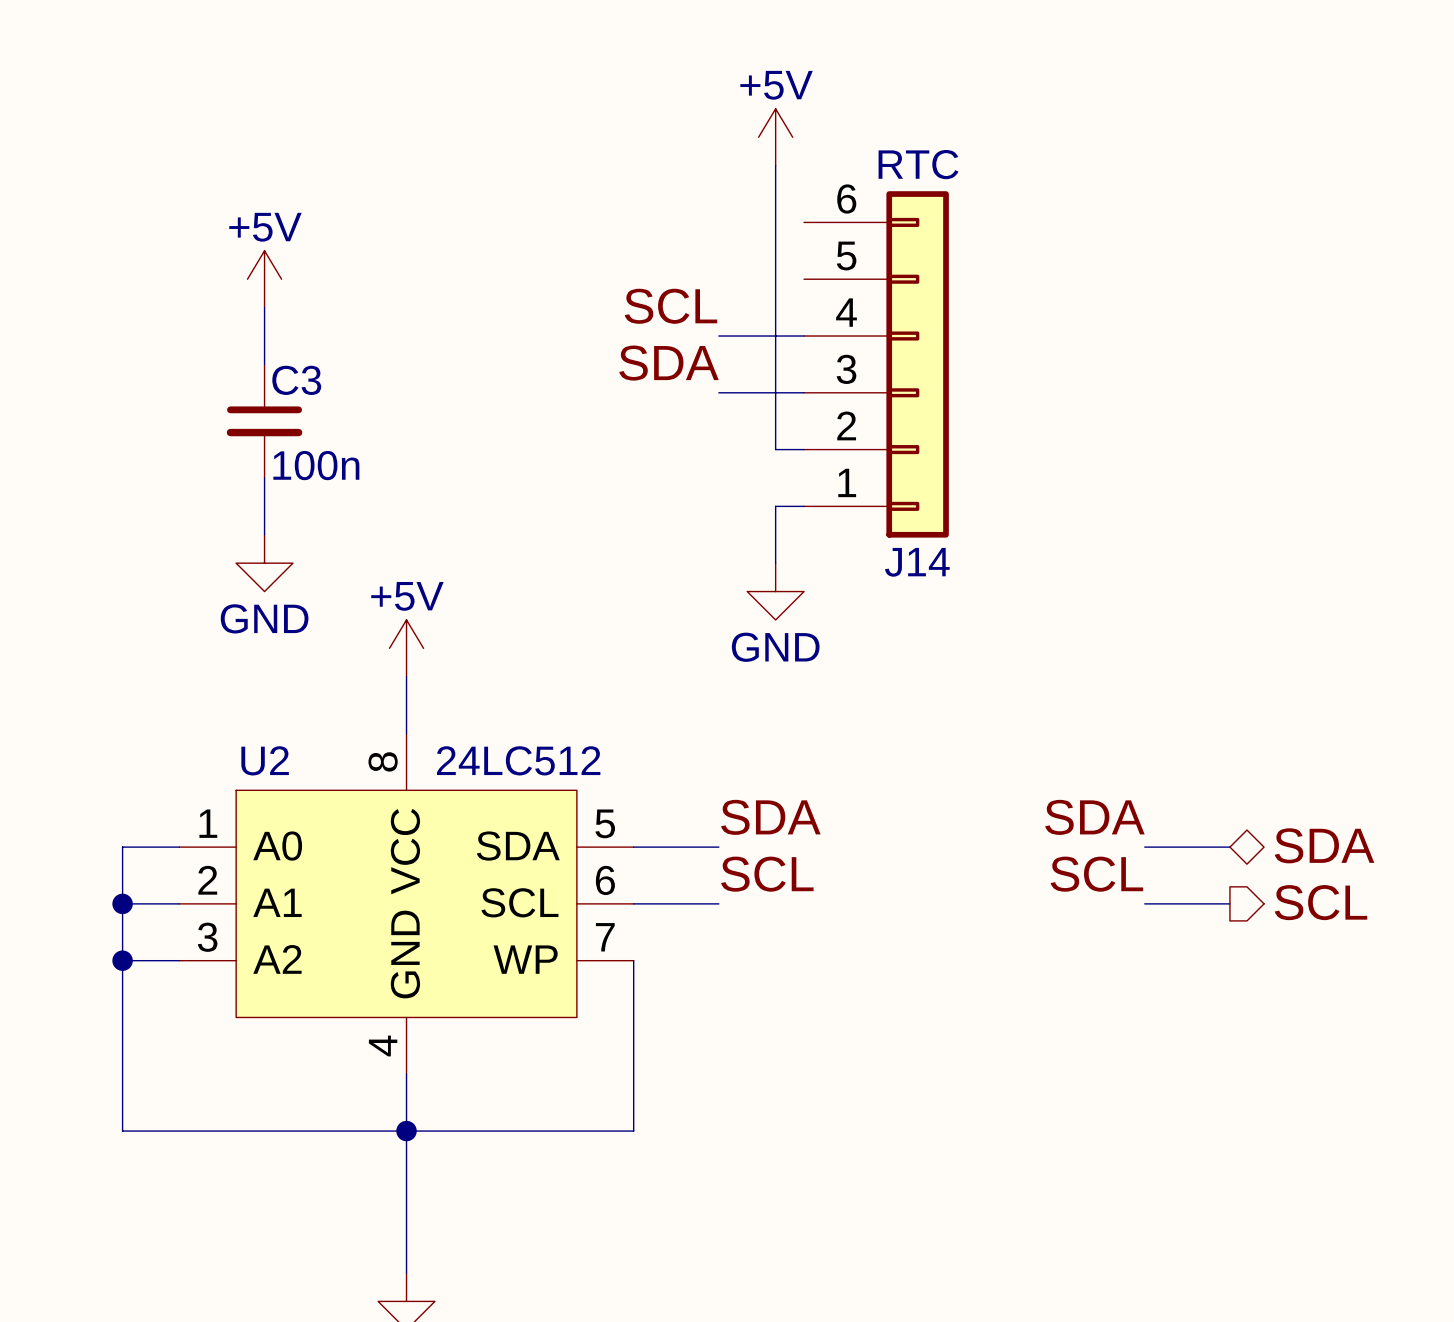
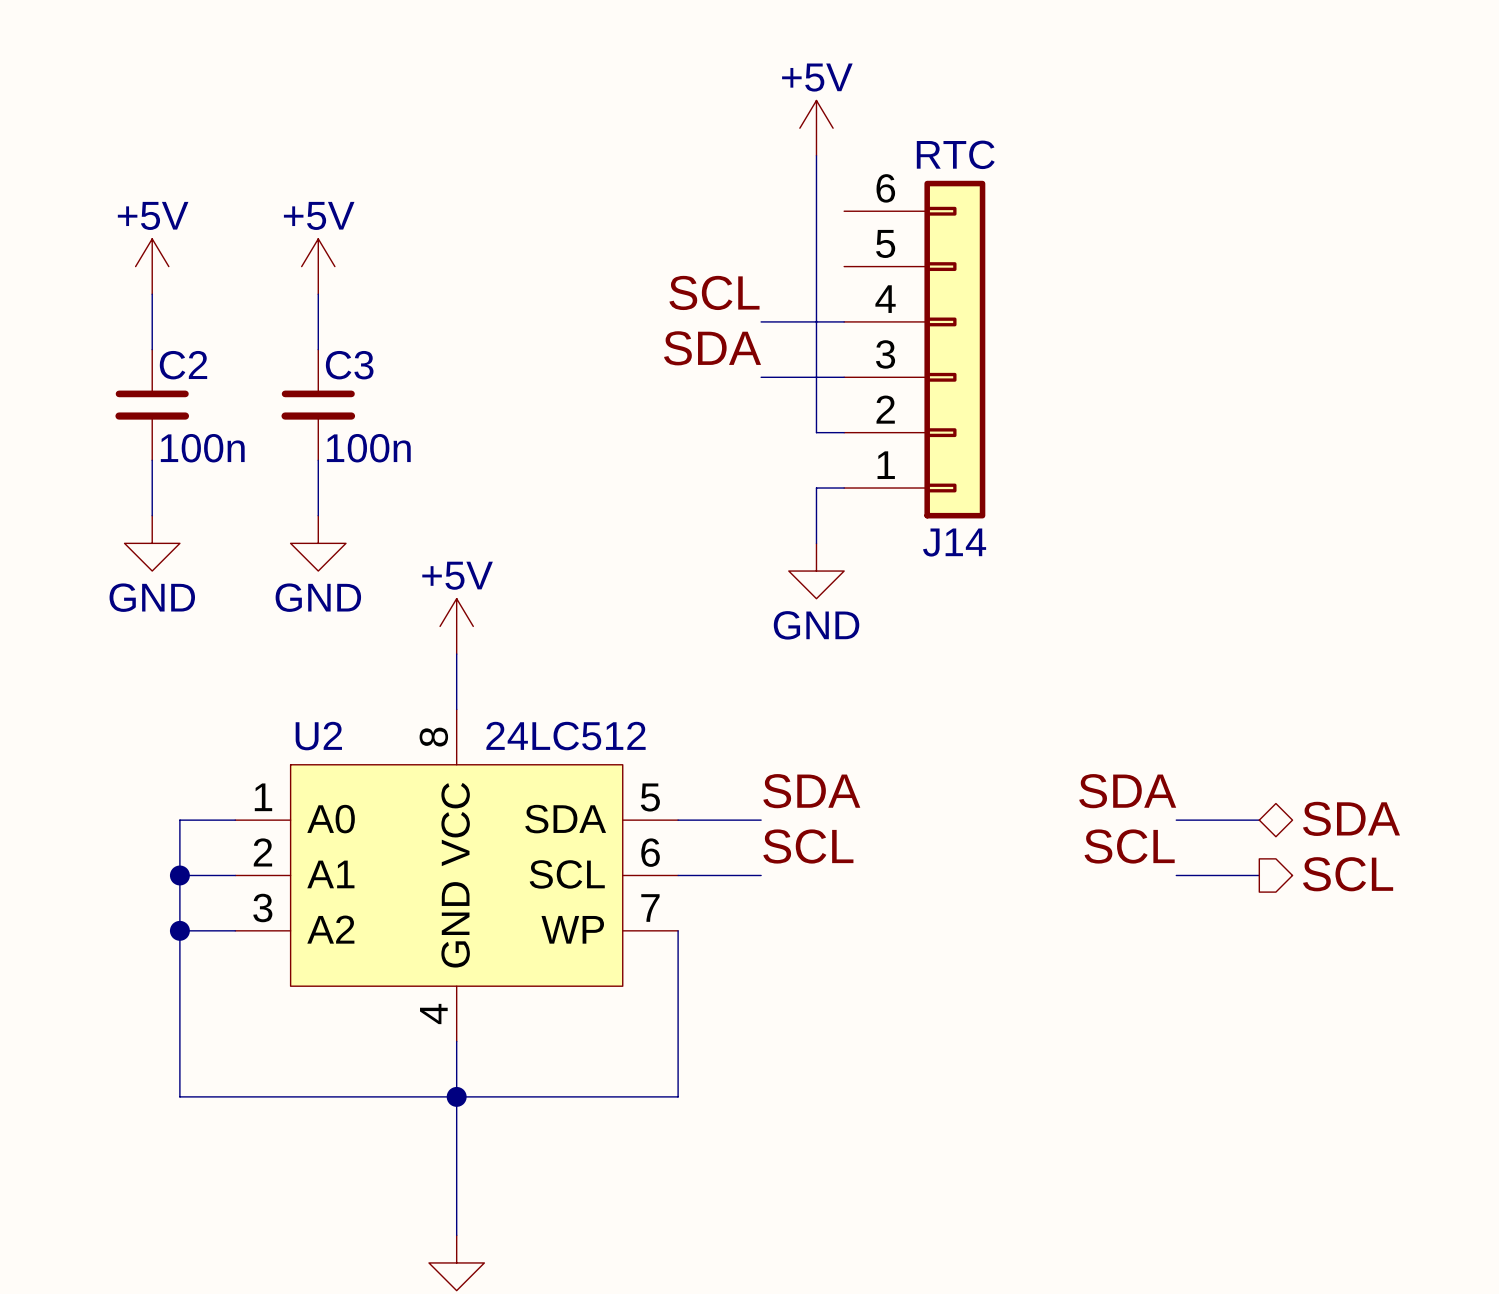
power symbol: none -> +5V (152, 266)
wire: none -> (152, 294) (152, 349)
C2: none -> 100n (152, 404)
wire: none -> (152, 460) (152, 515)
power symbol: none -> GND (152, 543)

